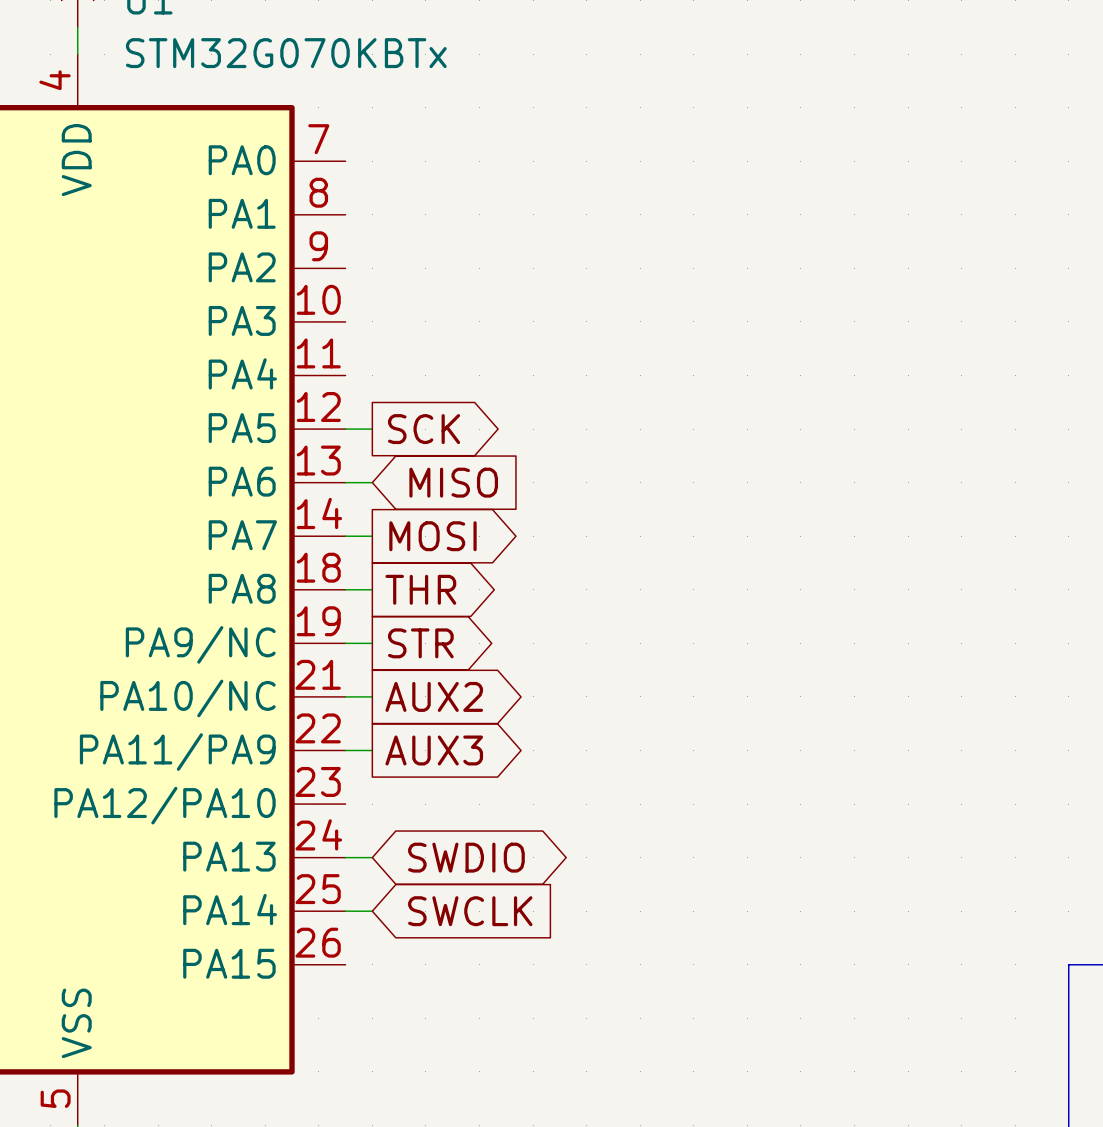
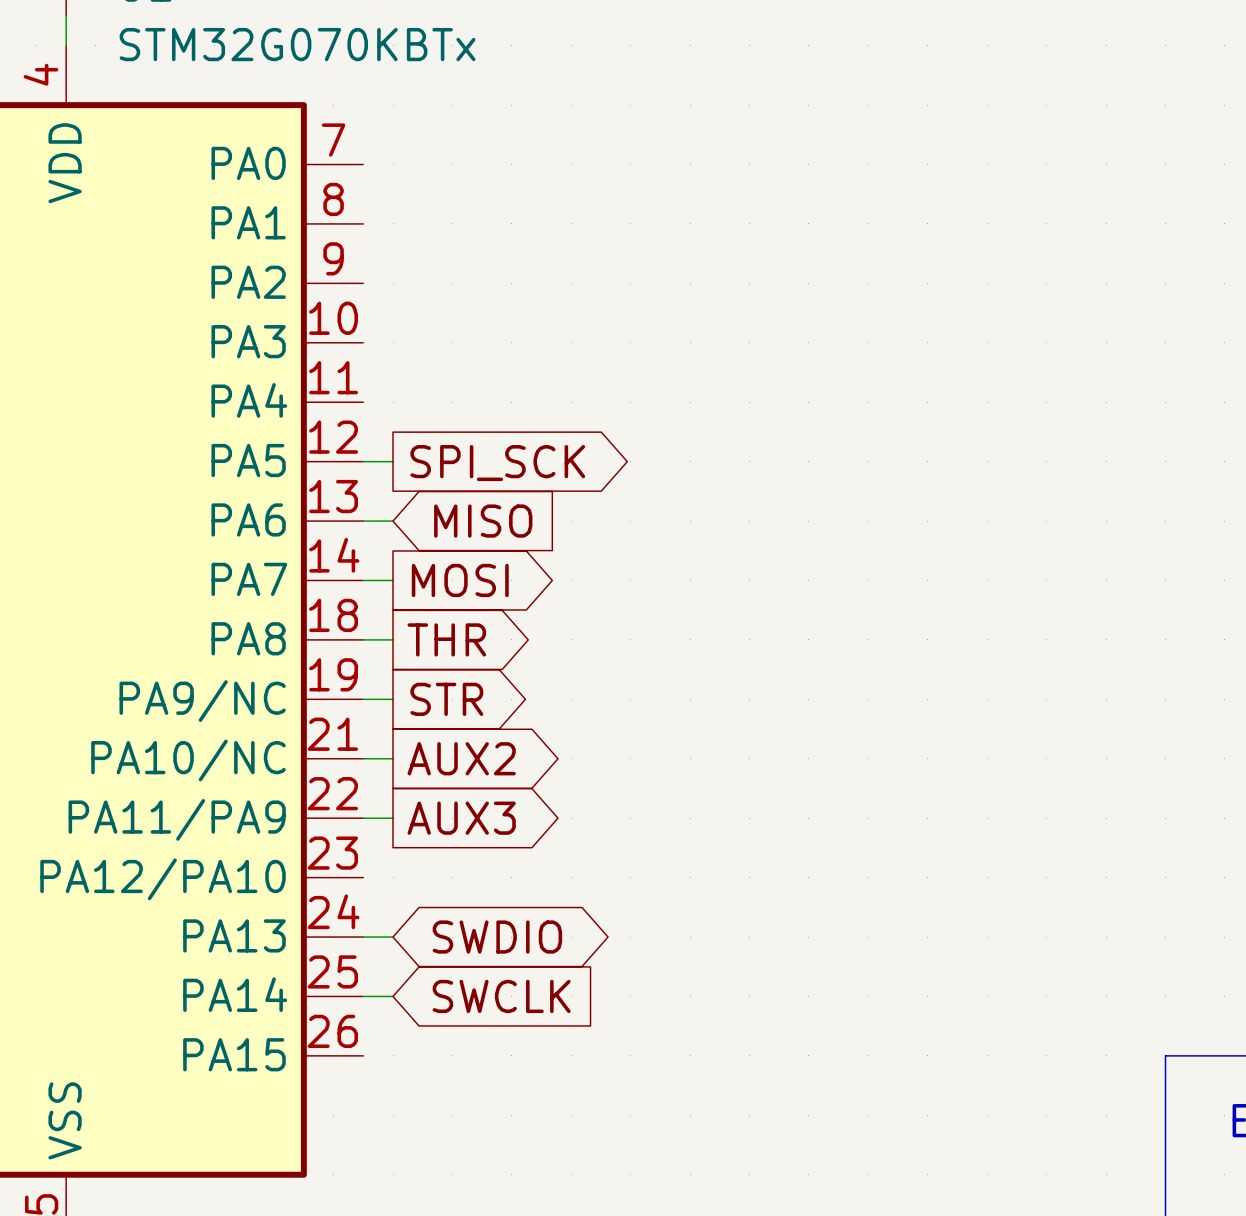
global label: SCK (424, 429) -> SPI_SCK (497, 463)

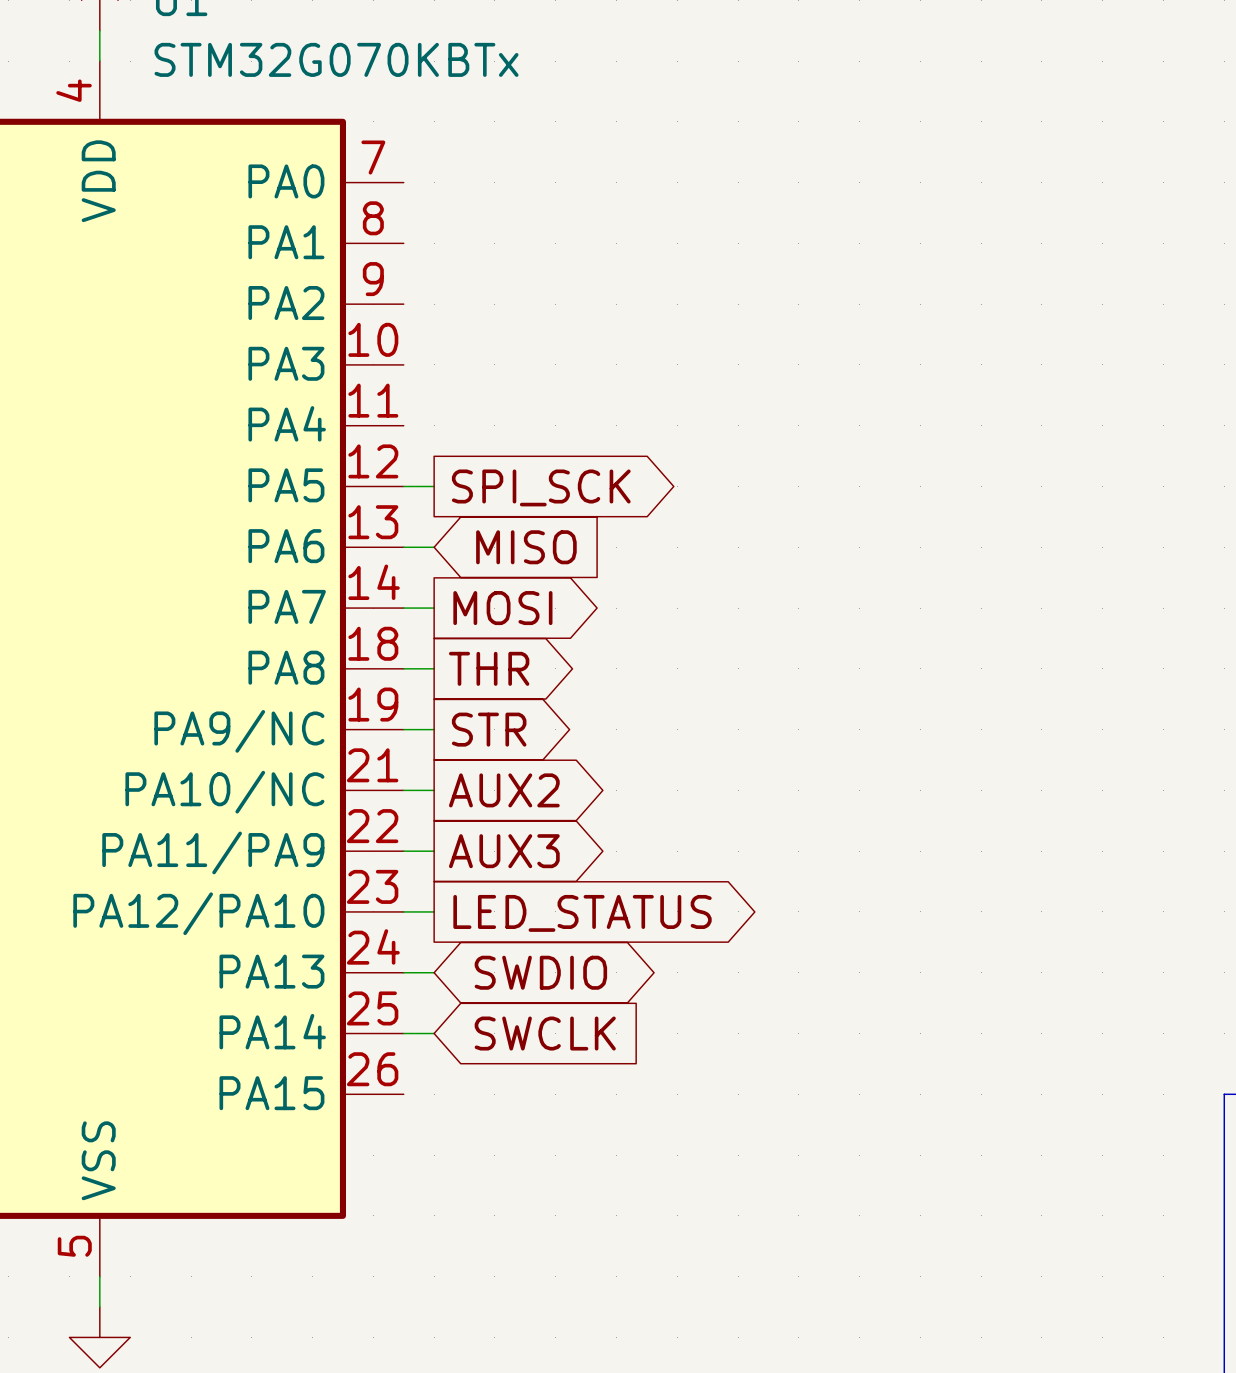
wire: none -> (403, 911) (434, 911)
global label: none -> LED_STATUS (582, 913)

